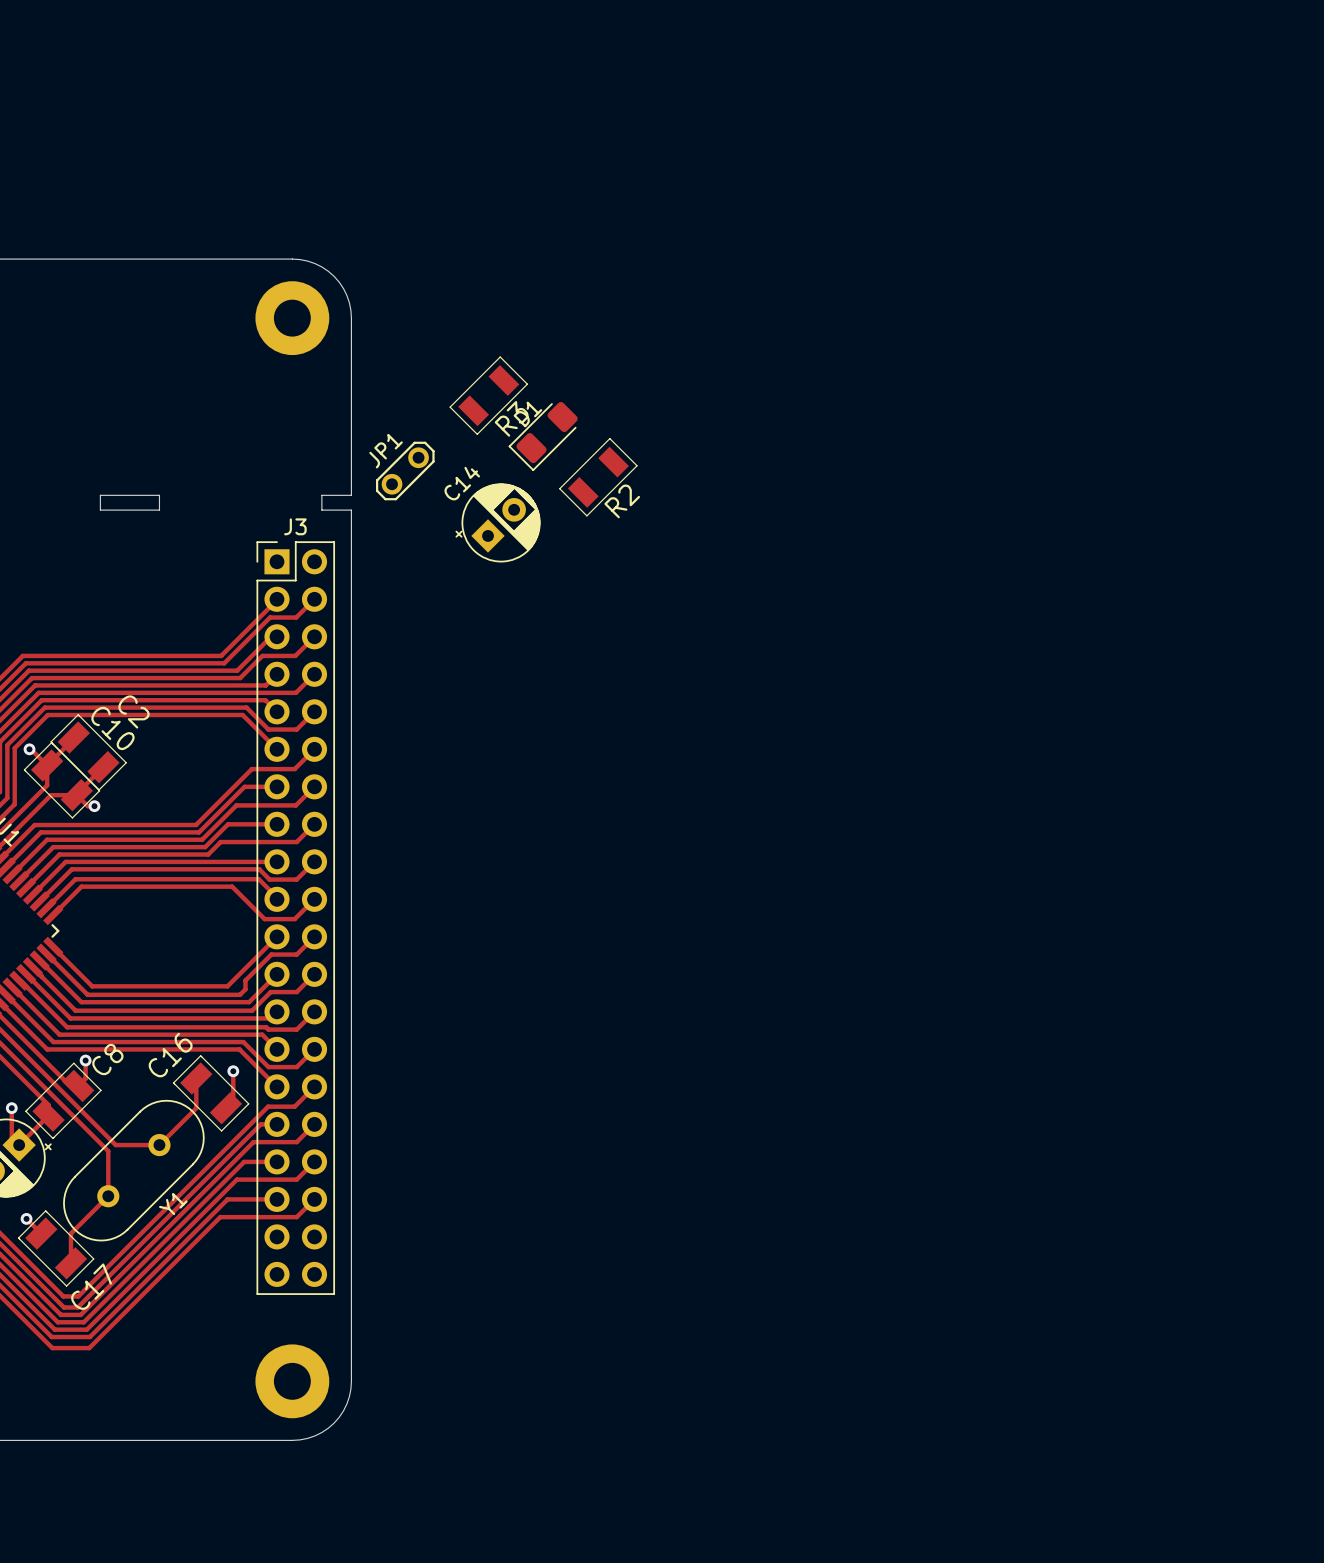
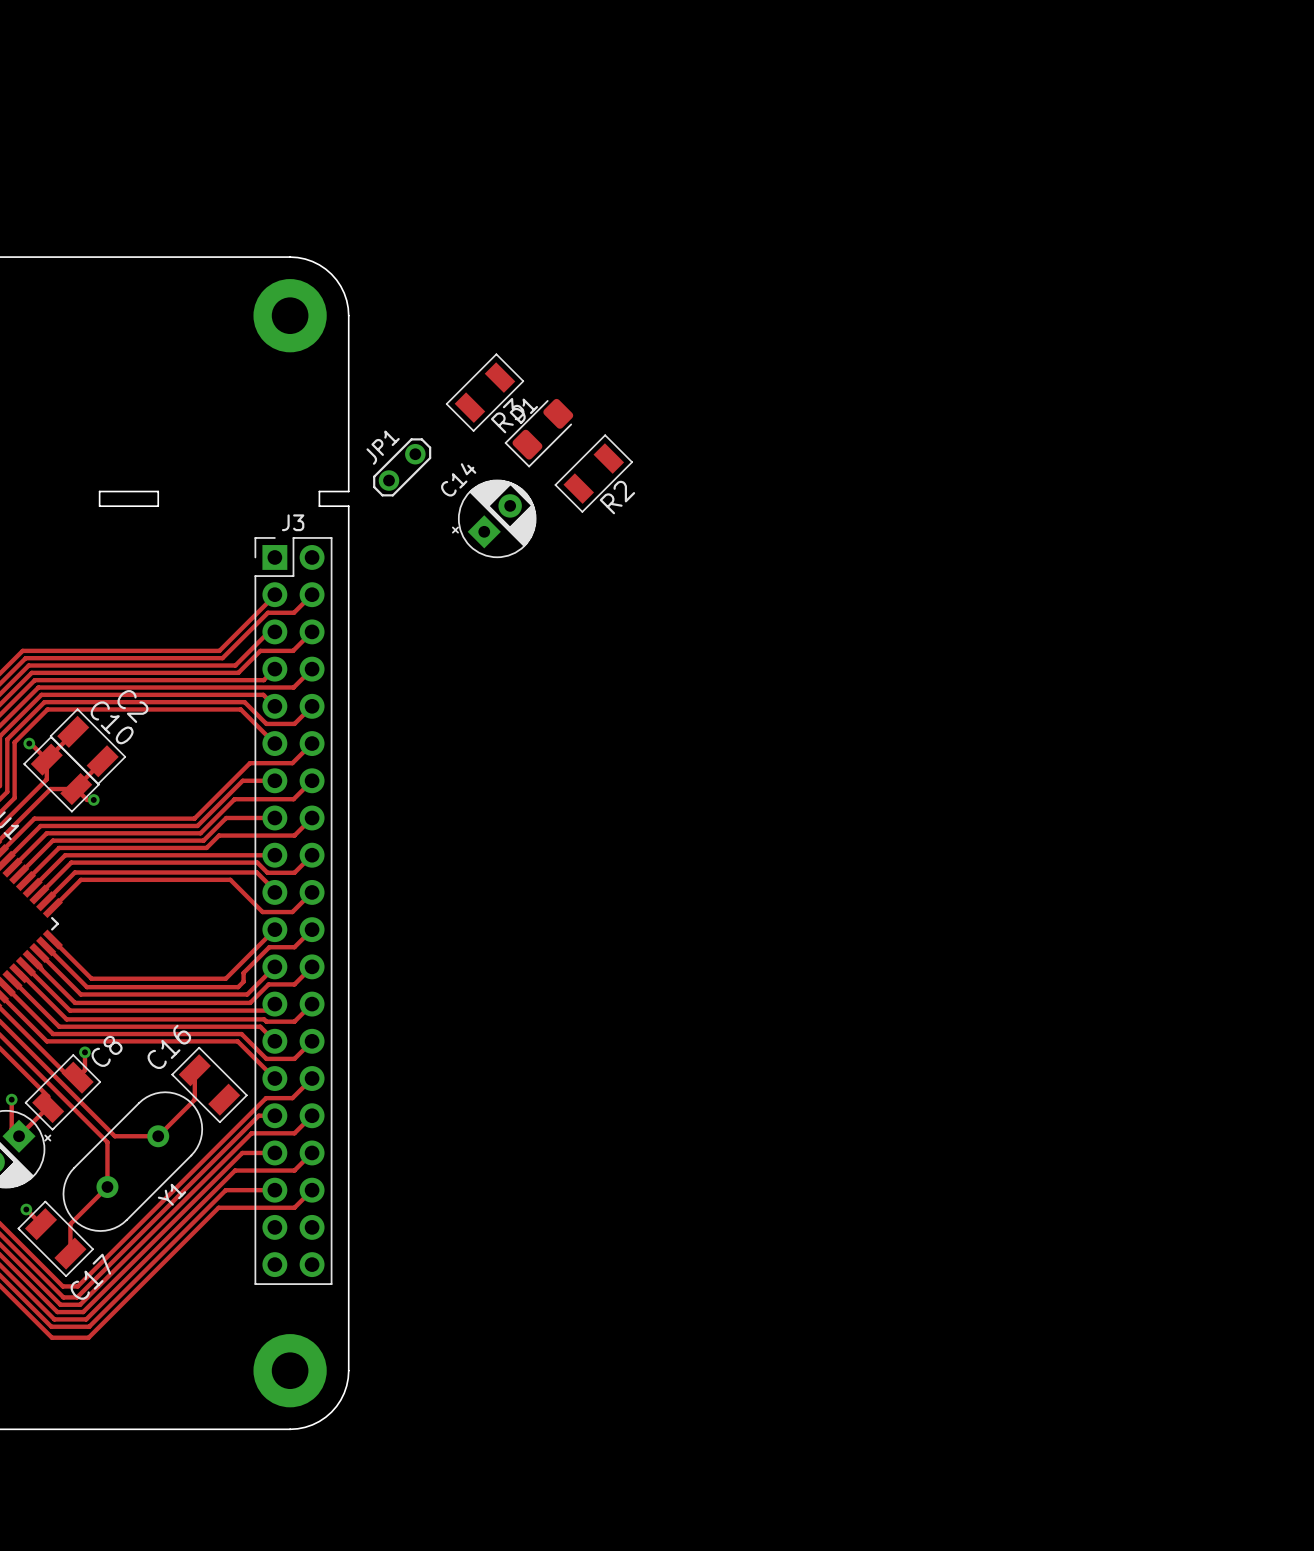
top track: (233, 1071) (233, 1100) (225, 1108) -> none
via: (233, 1071) -> none

